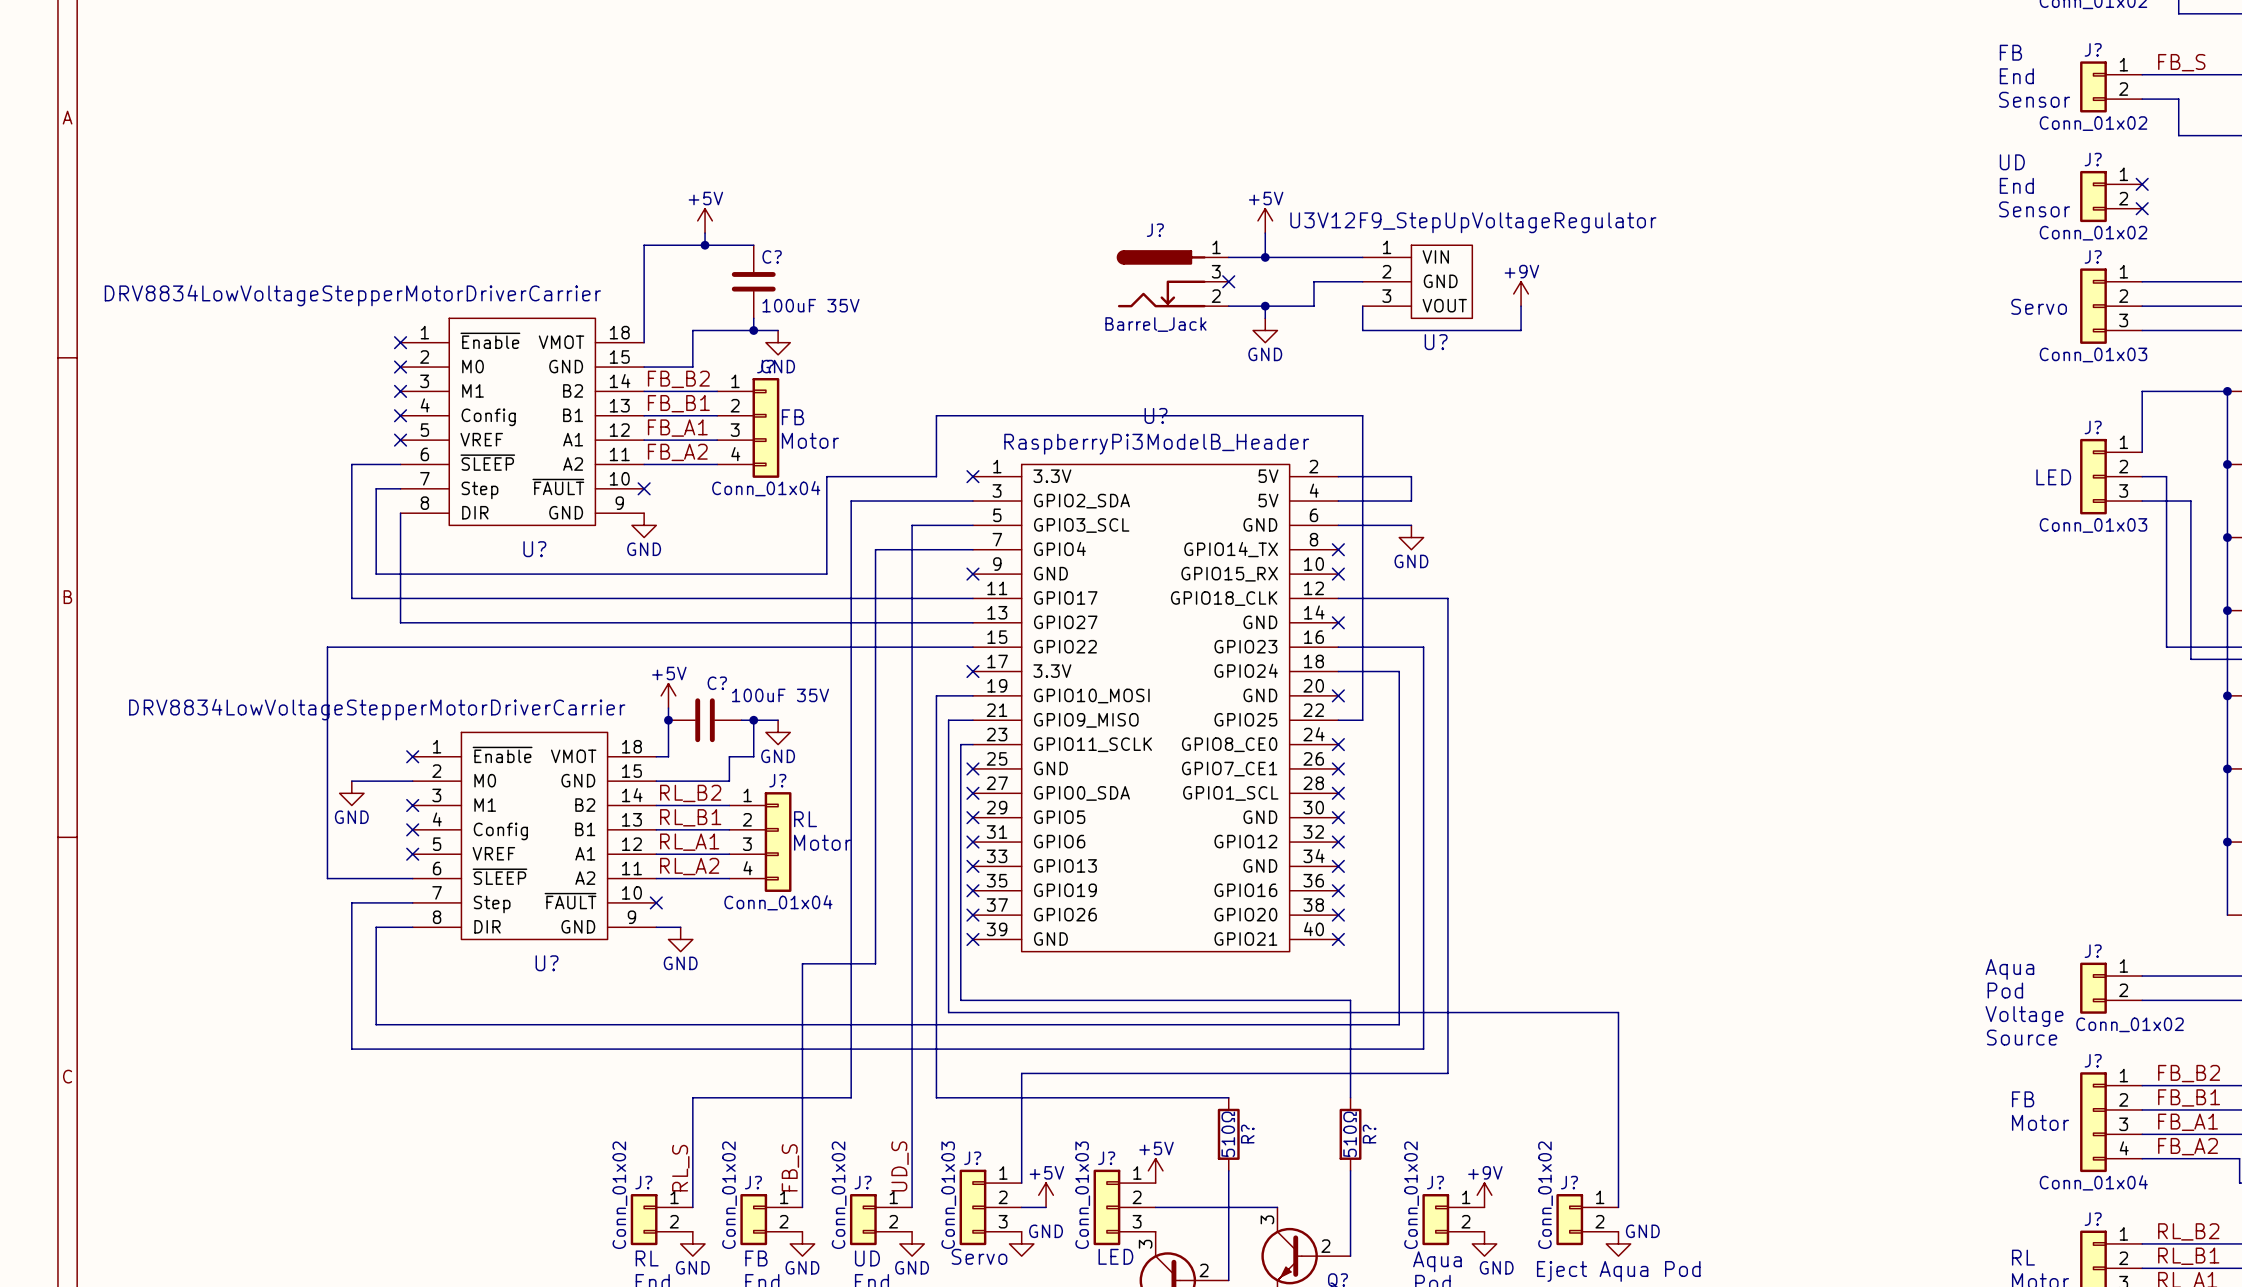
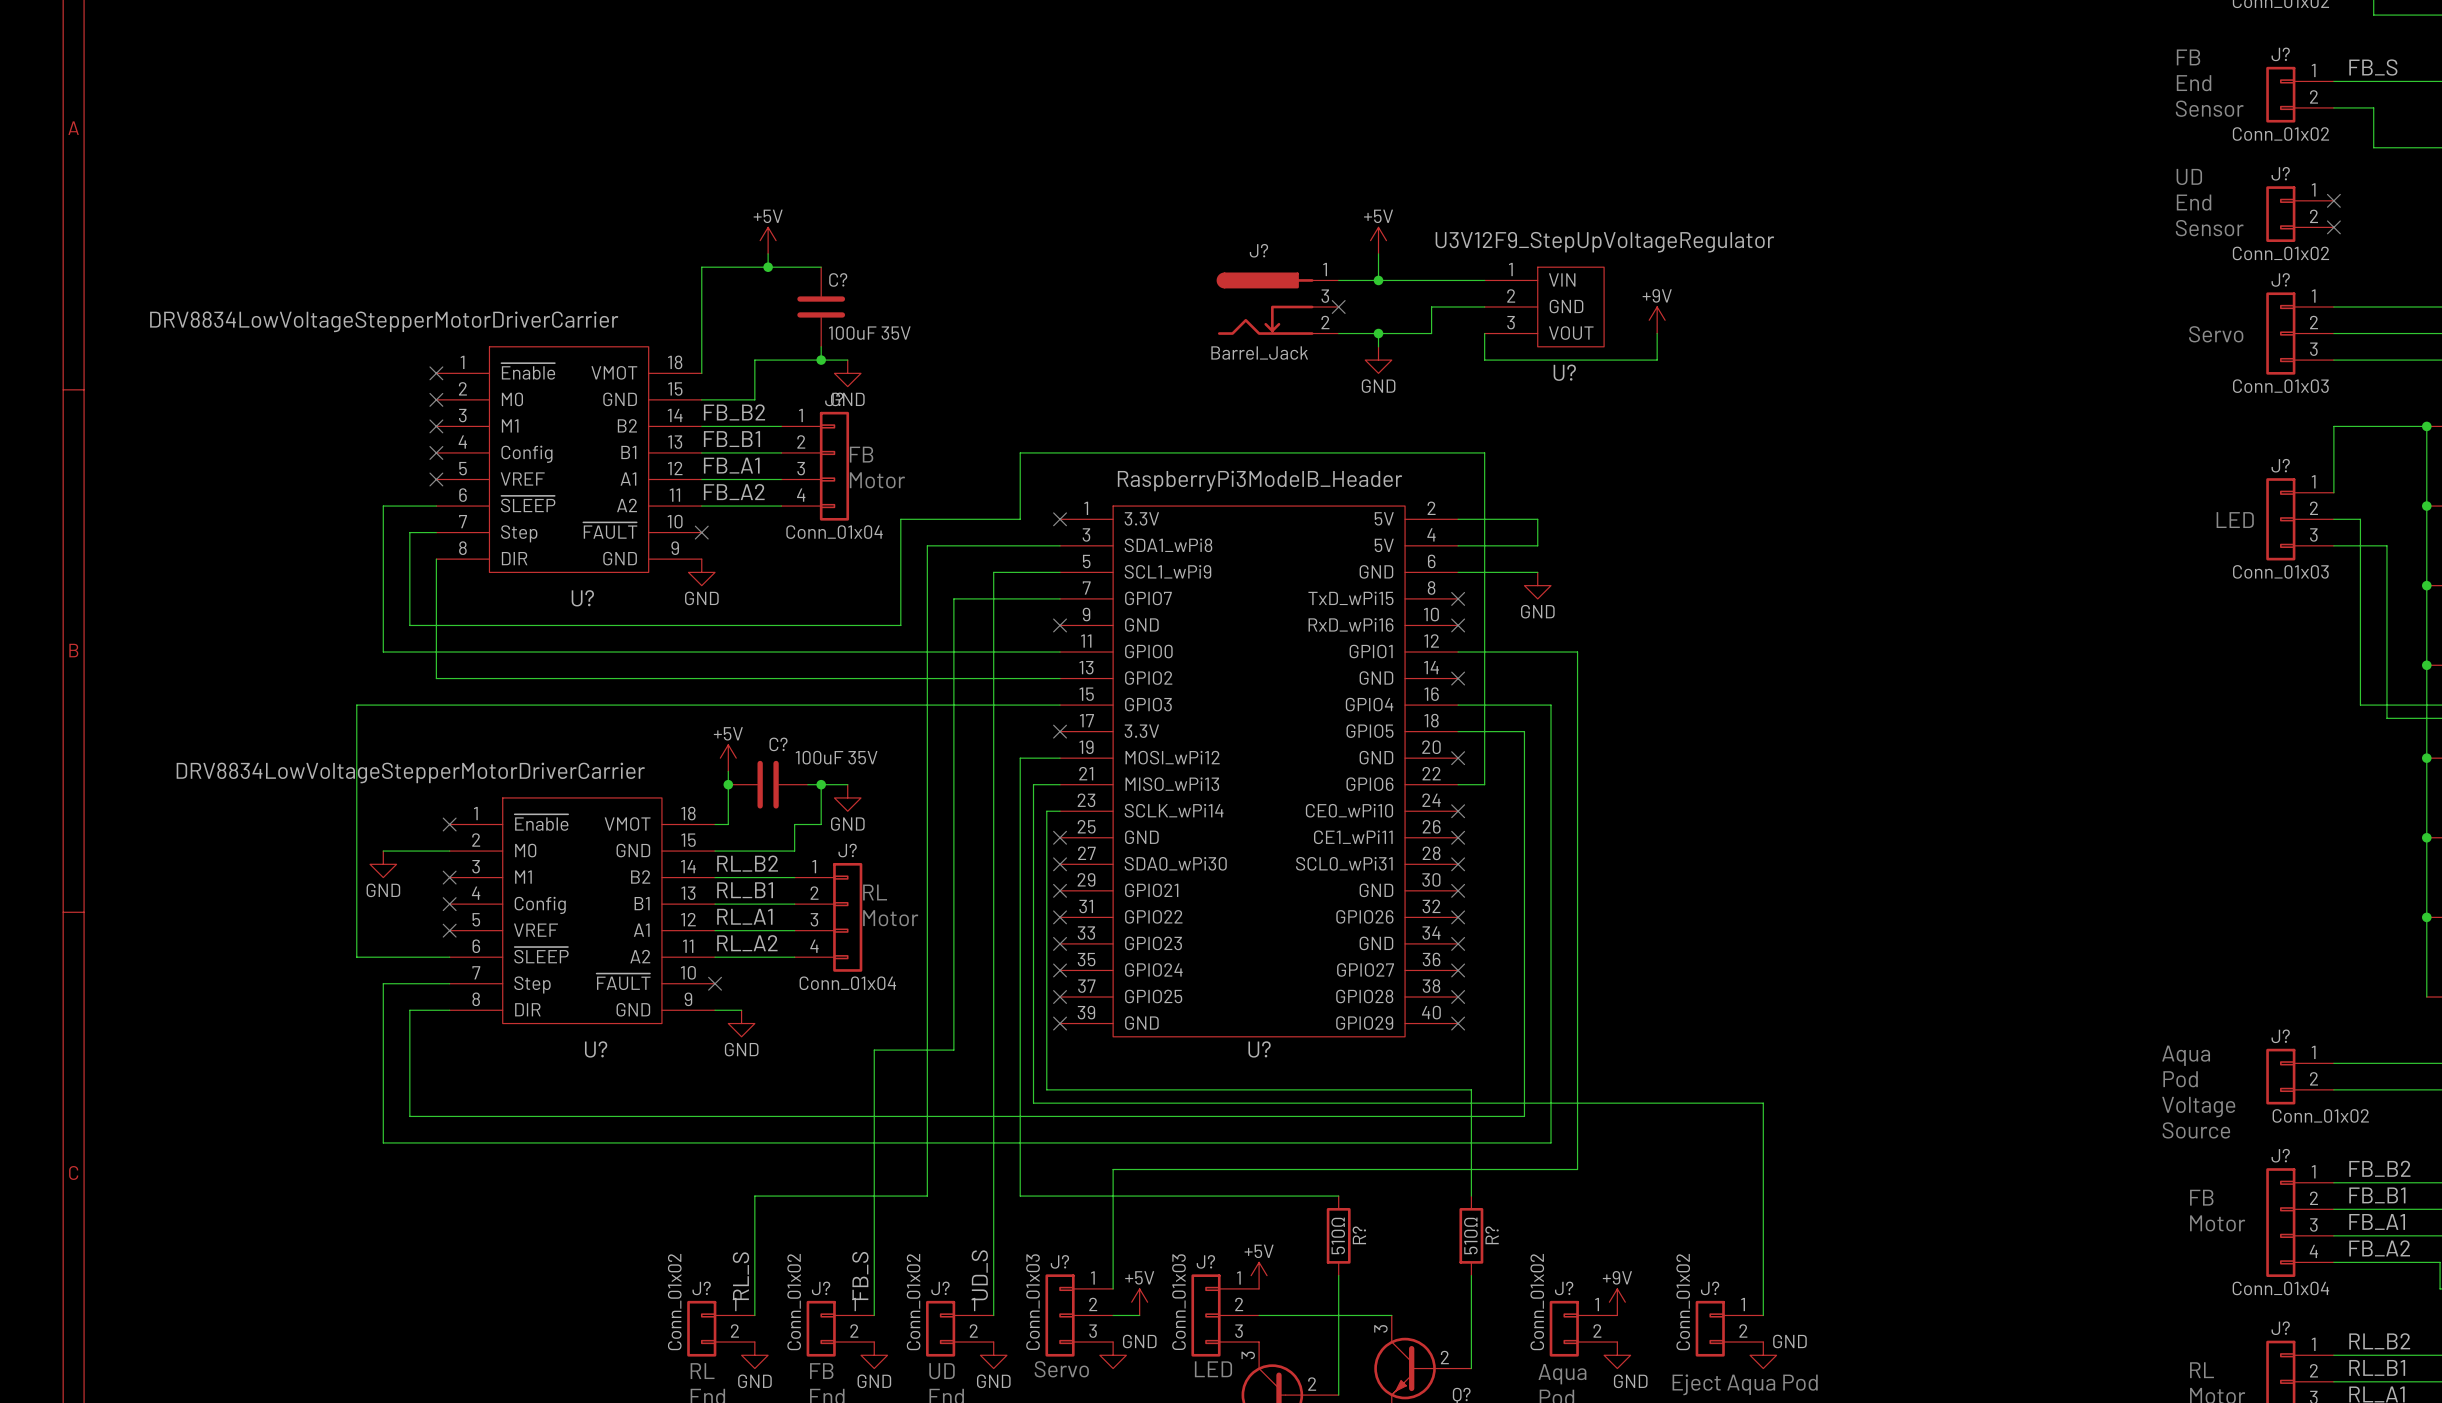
U? name position: U? (1156, 415) -> U? (1259, 1049)
U? symbol: [972, 464, 1339, 952] -> [1060, 506, 1459, 1037]

